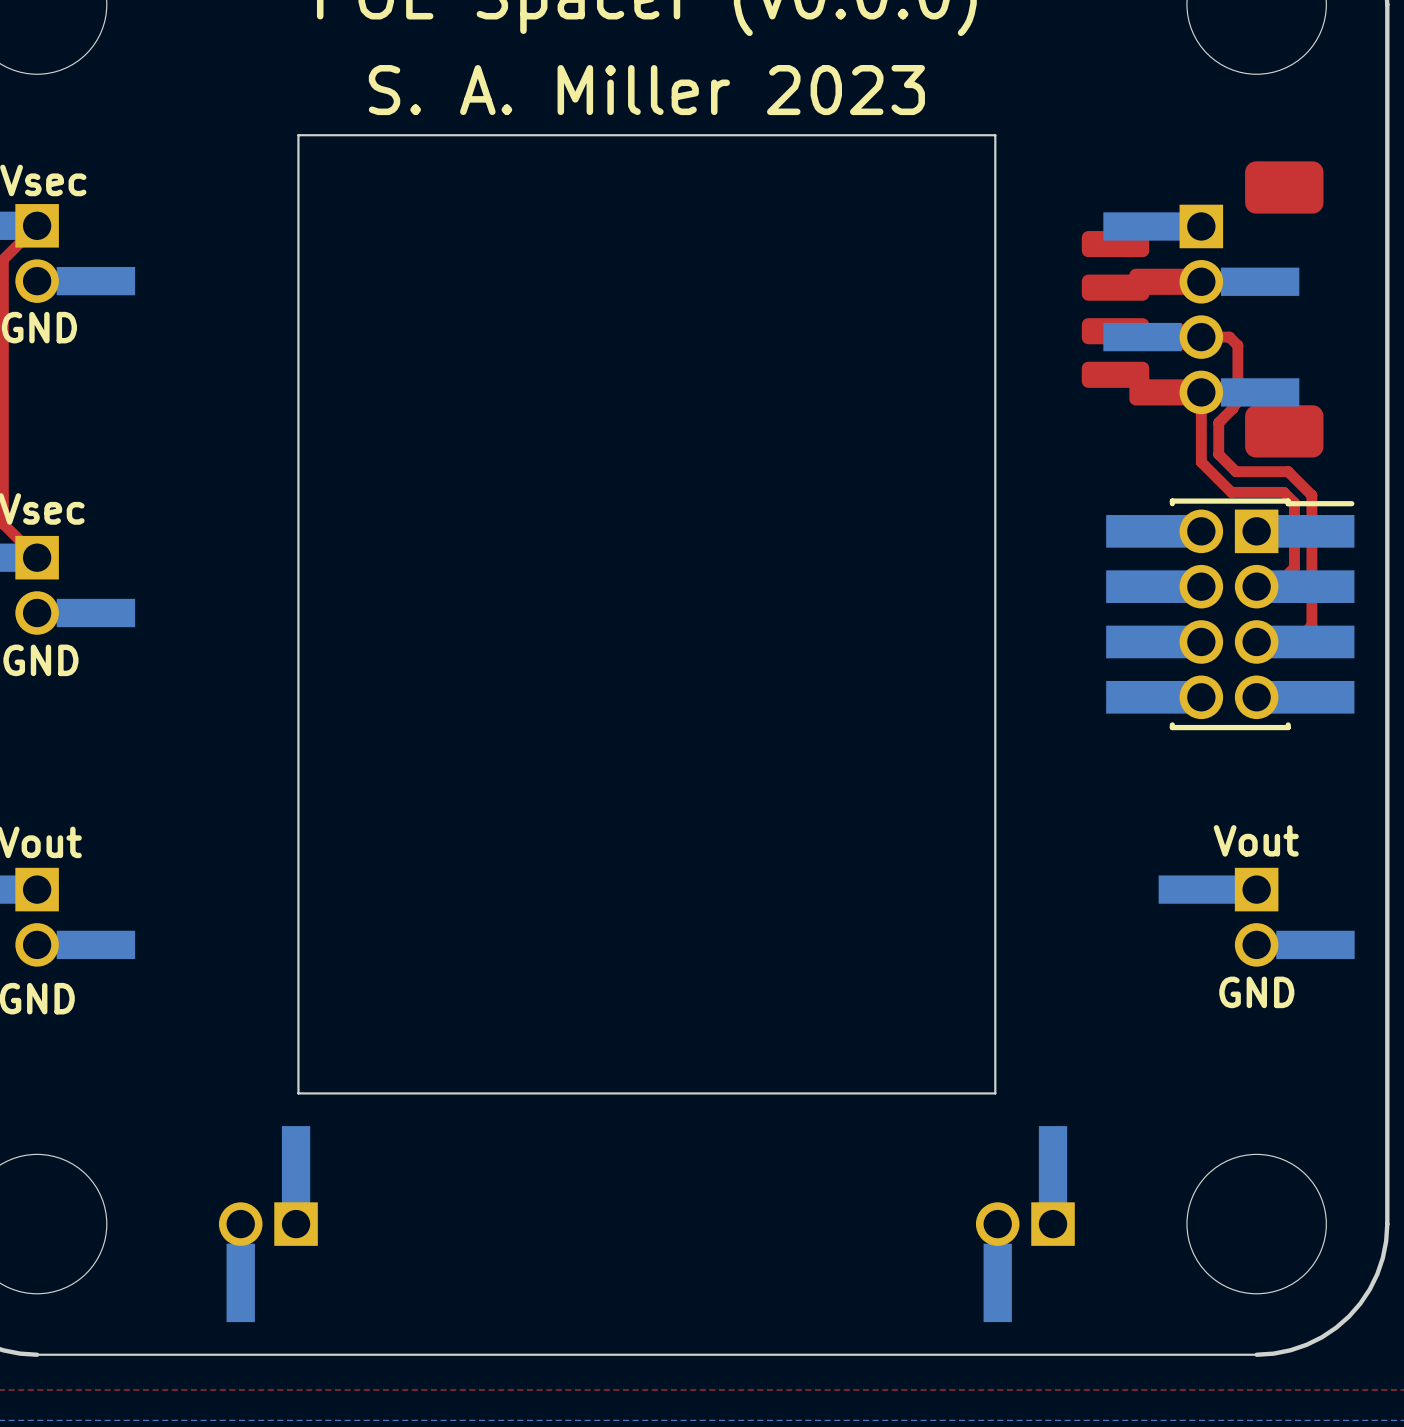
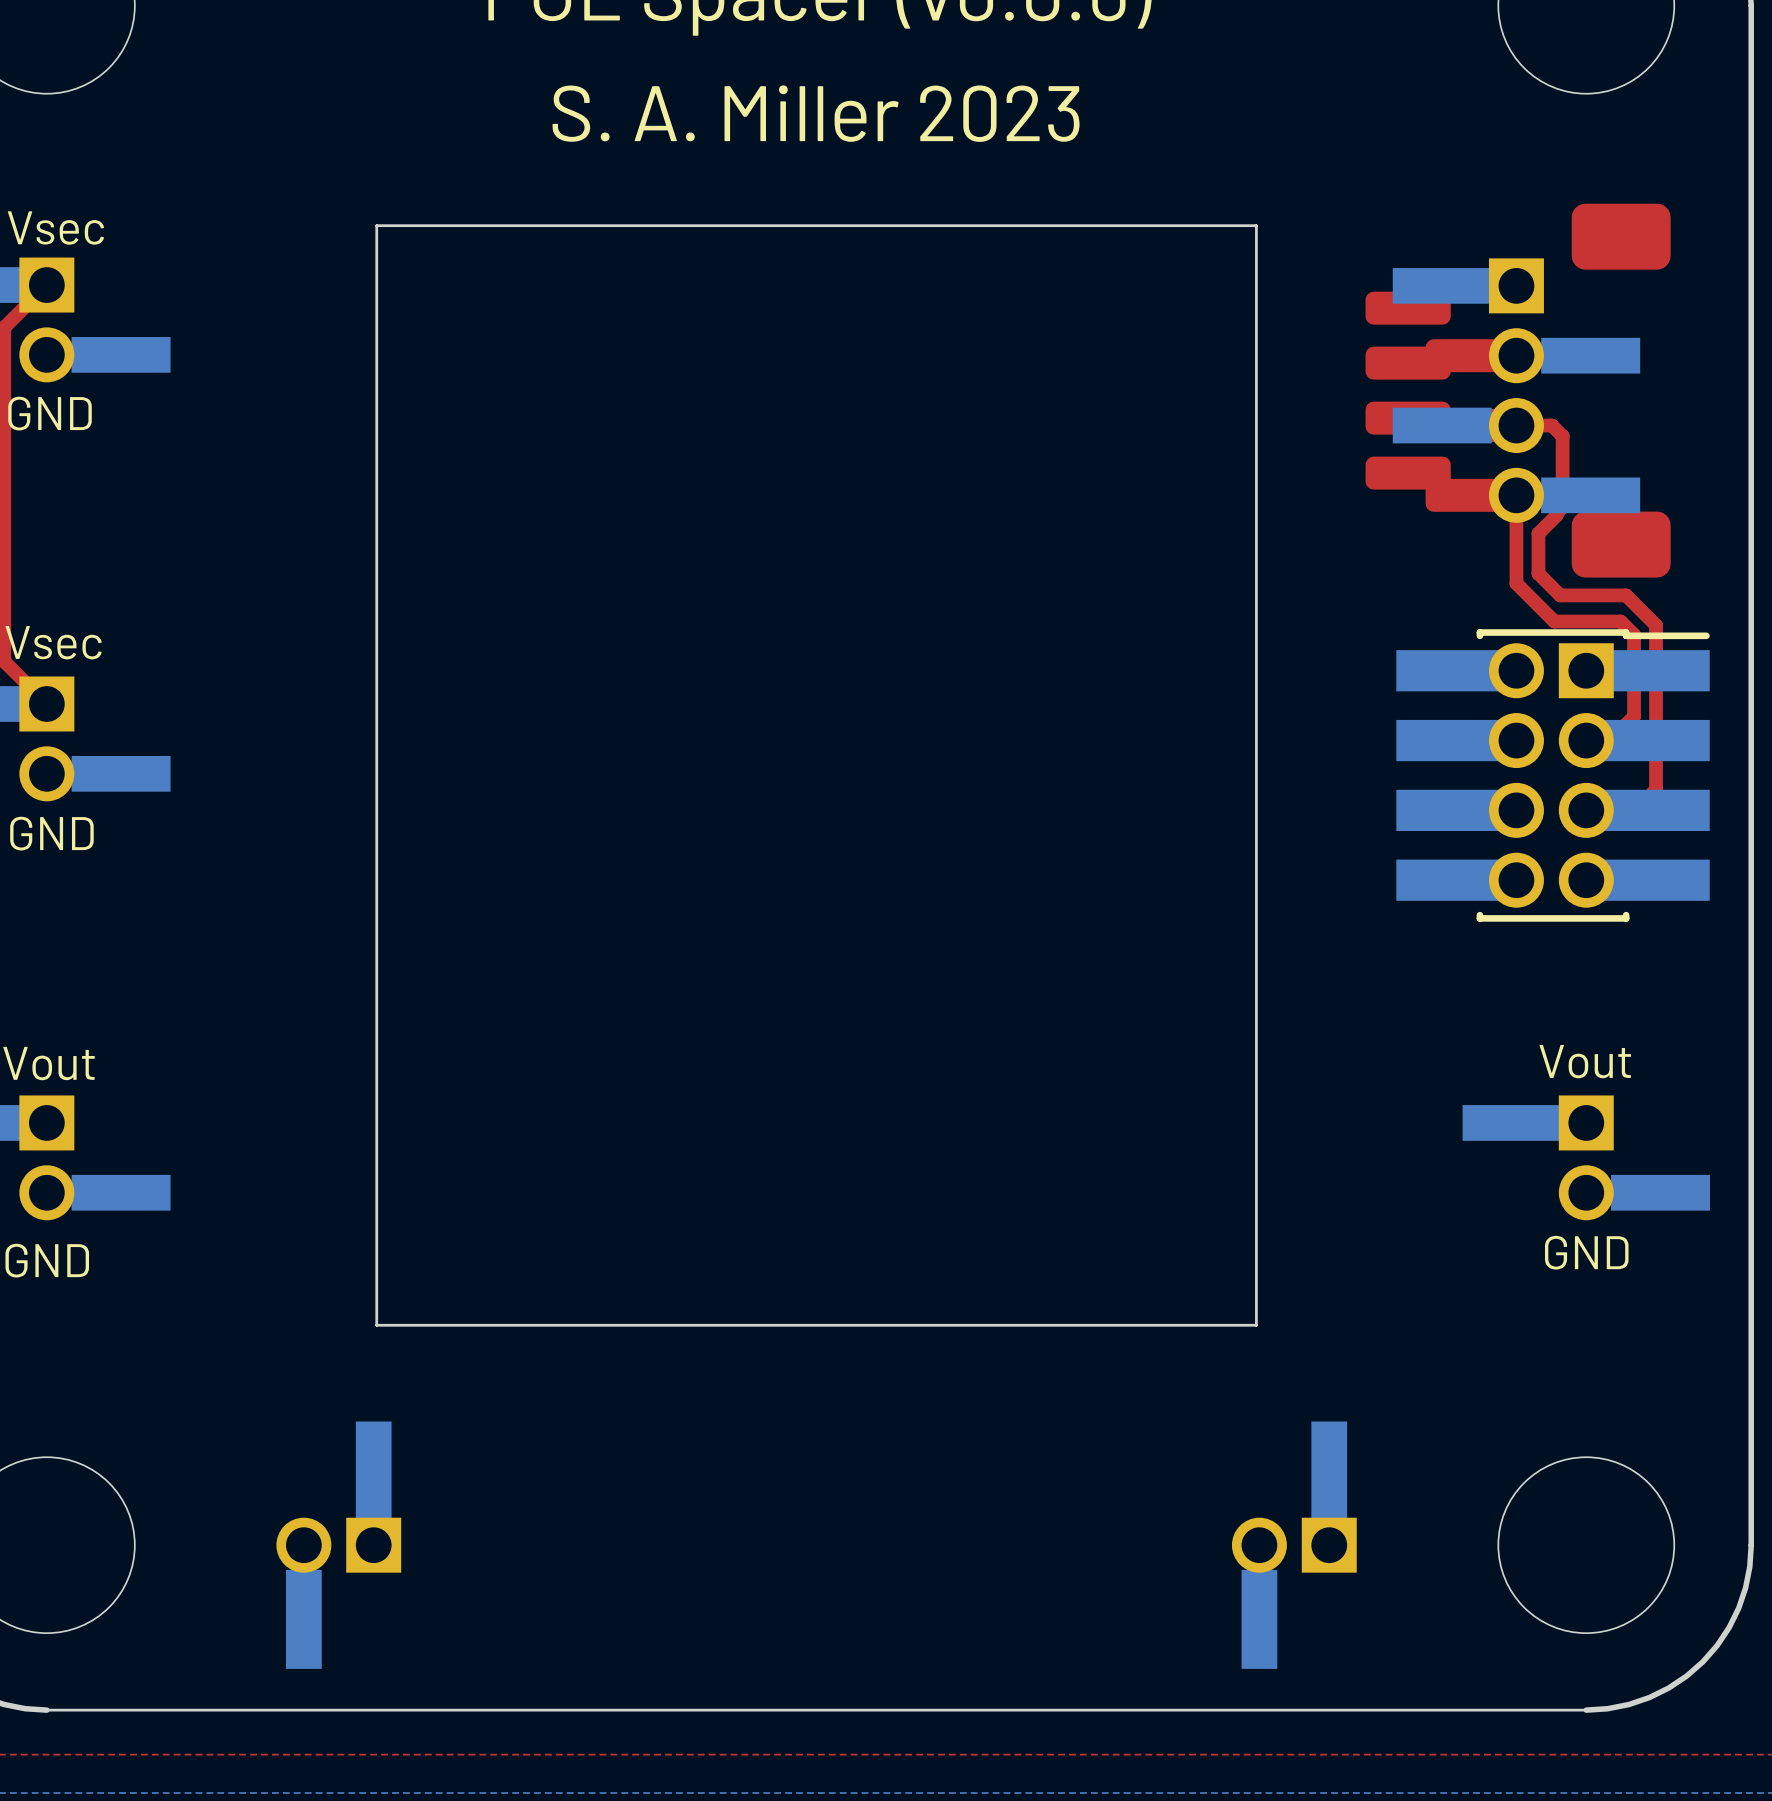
board edge: (995, 178) (995, 135) (298, 135) (298, 178) -> (1256, 225) (376, 225)
board edge: (995, 1049) (995, 1093) (298, 1093) (298, 1049) -> (1256, 1325) (376, 1325)

